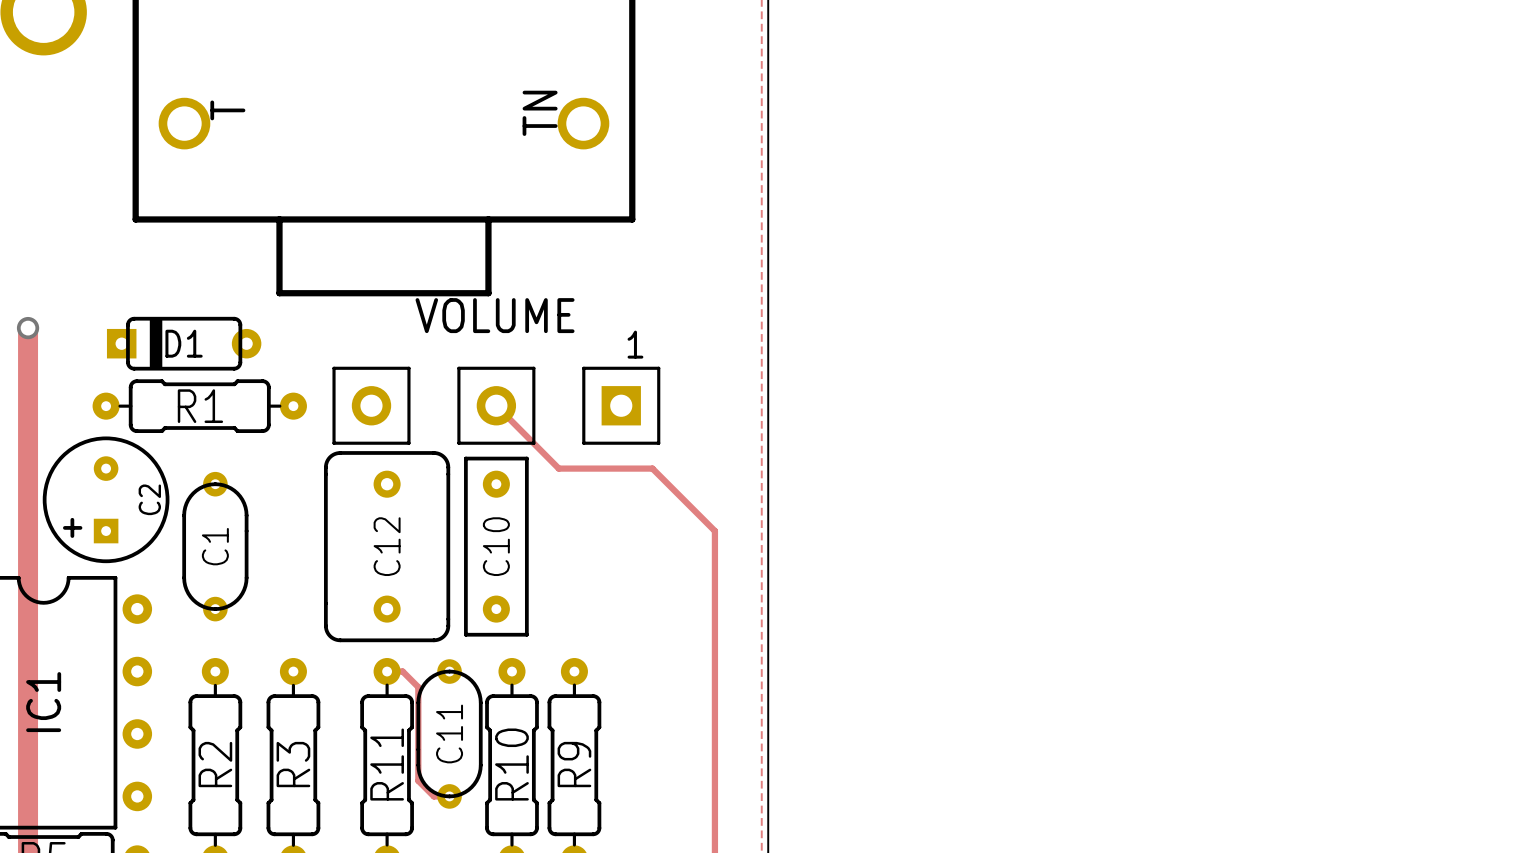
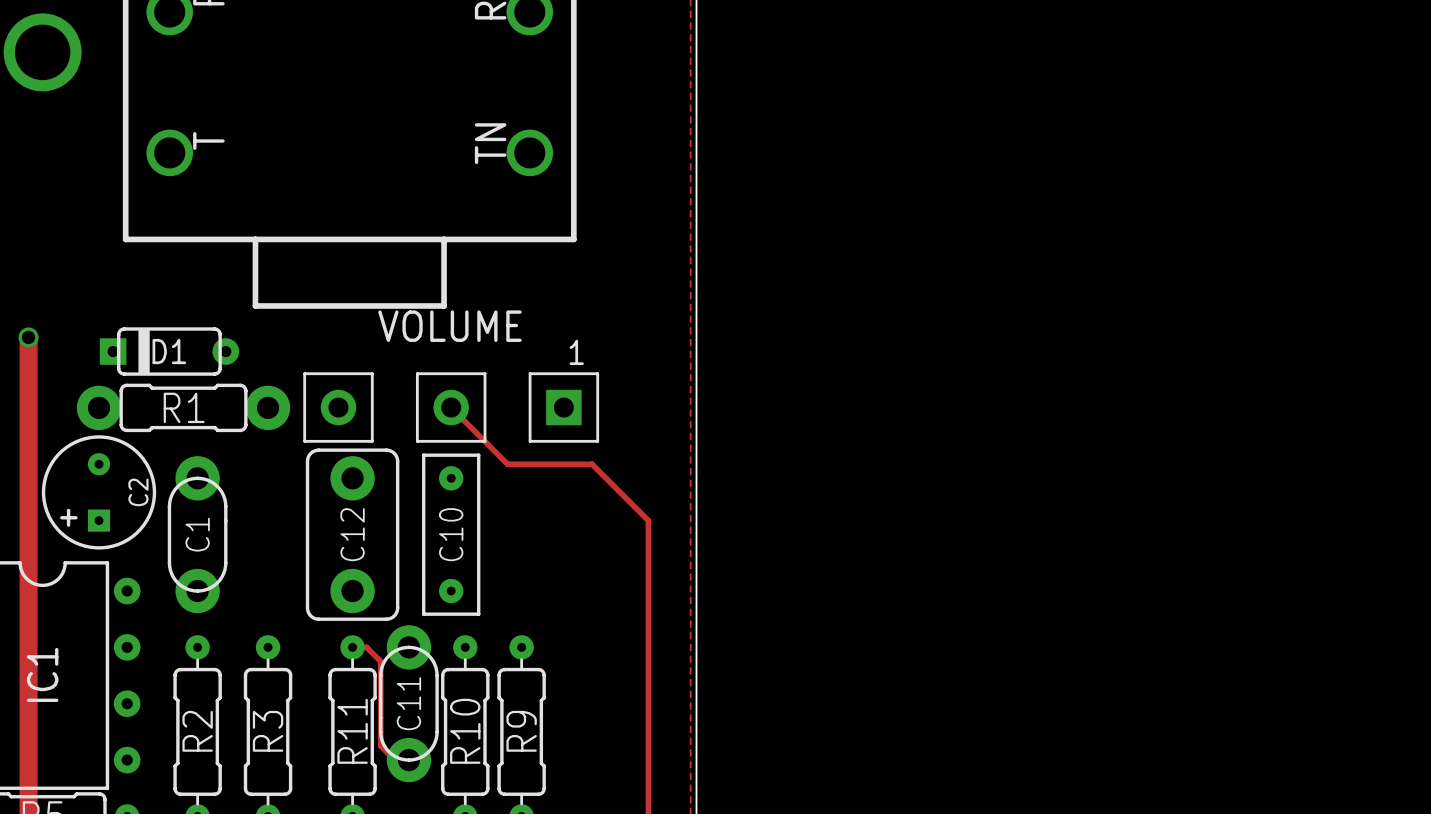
R1 footprint: [92, 379, 307, 433] -> [76, 383, 291, 433]
C12 footprint: [324, 451, 451, 643] -> [305, 448, 400, 621]
C1 footprint: [182, 471, 249, 622] -> [167, 456, 228, 614]
C11 footprint: [416, 659, 483, 809] -> [379, 625, 439, 783]

